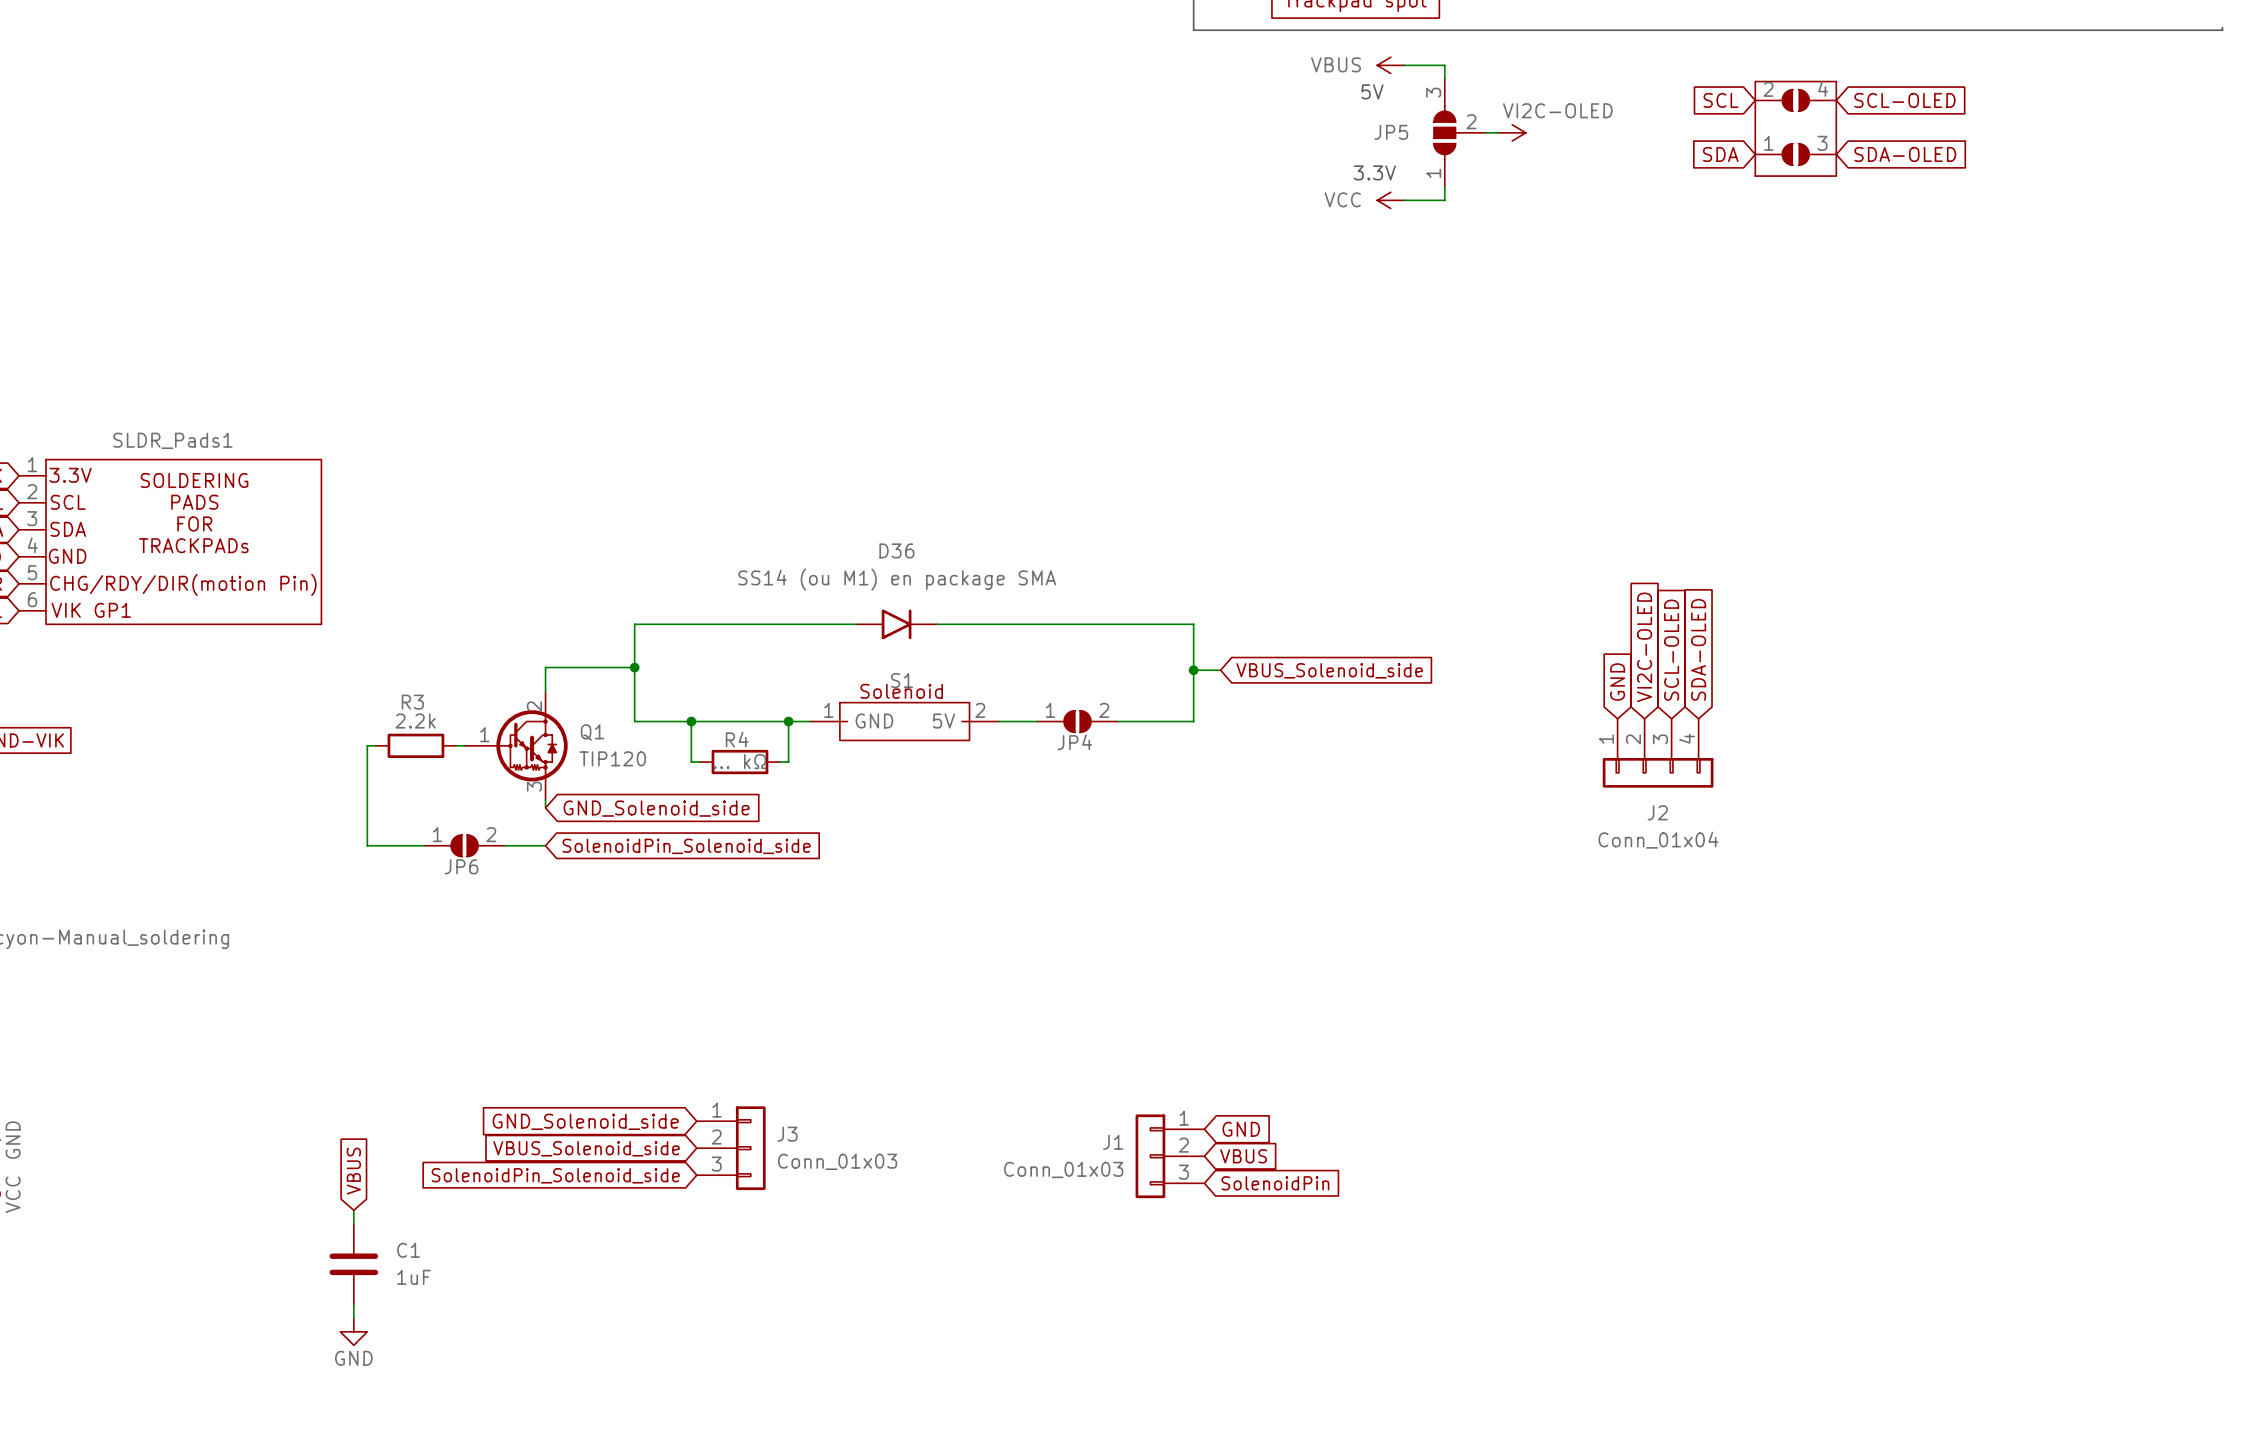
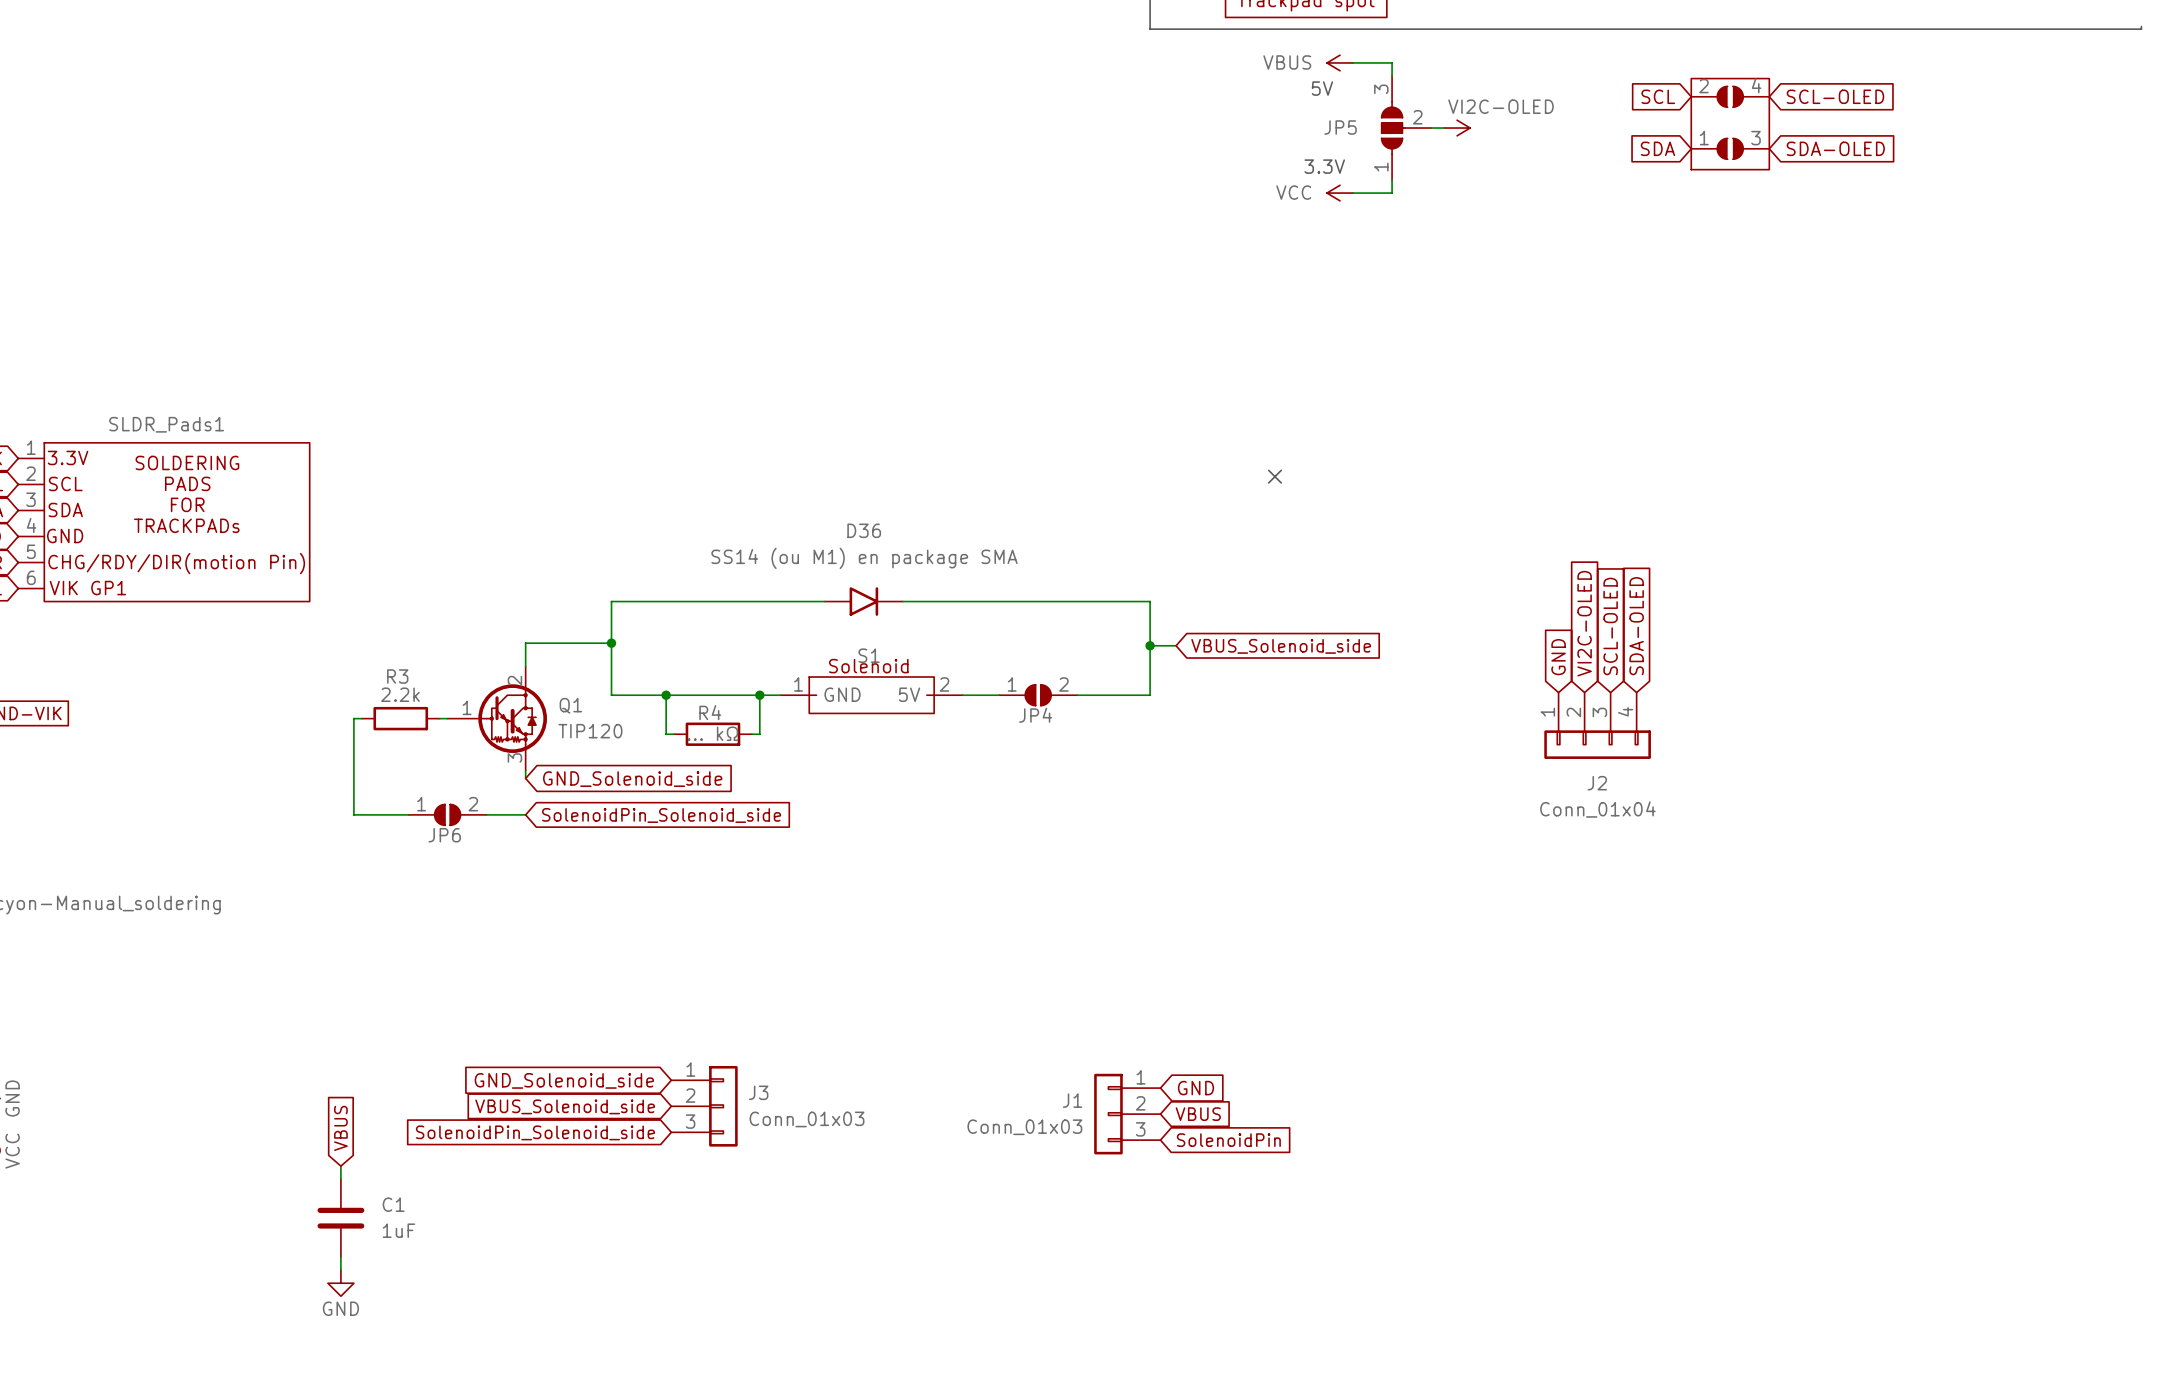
no-connect mark: none -> (1274, 476)

